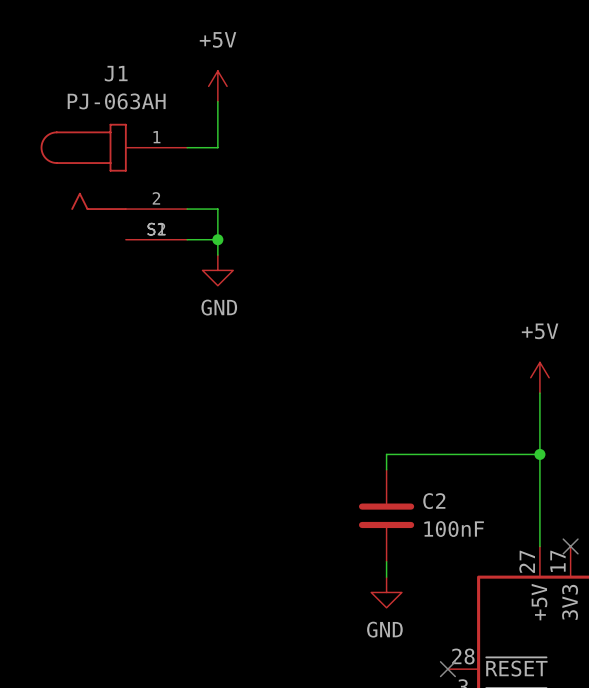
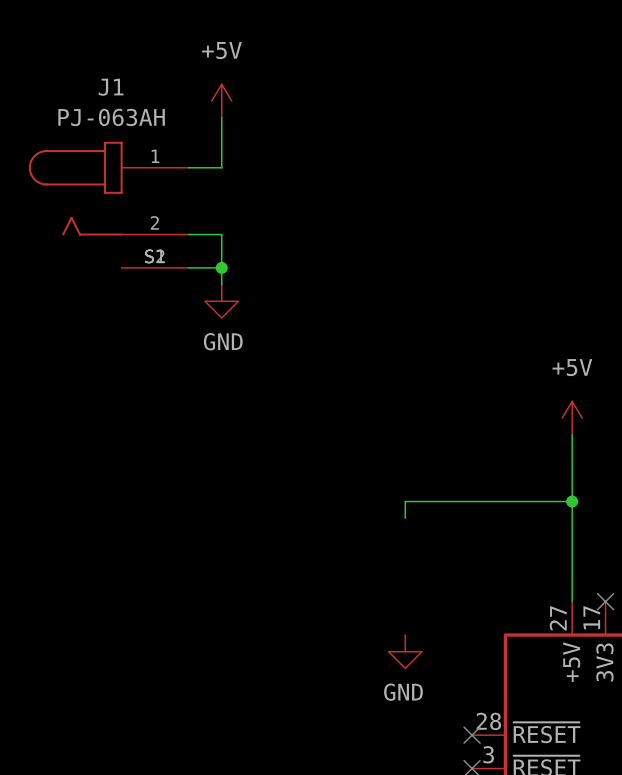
C2: 100nF (386, 515) -> none
wire: (386, 561) (386, 577) -> none

